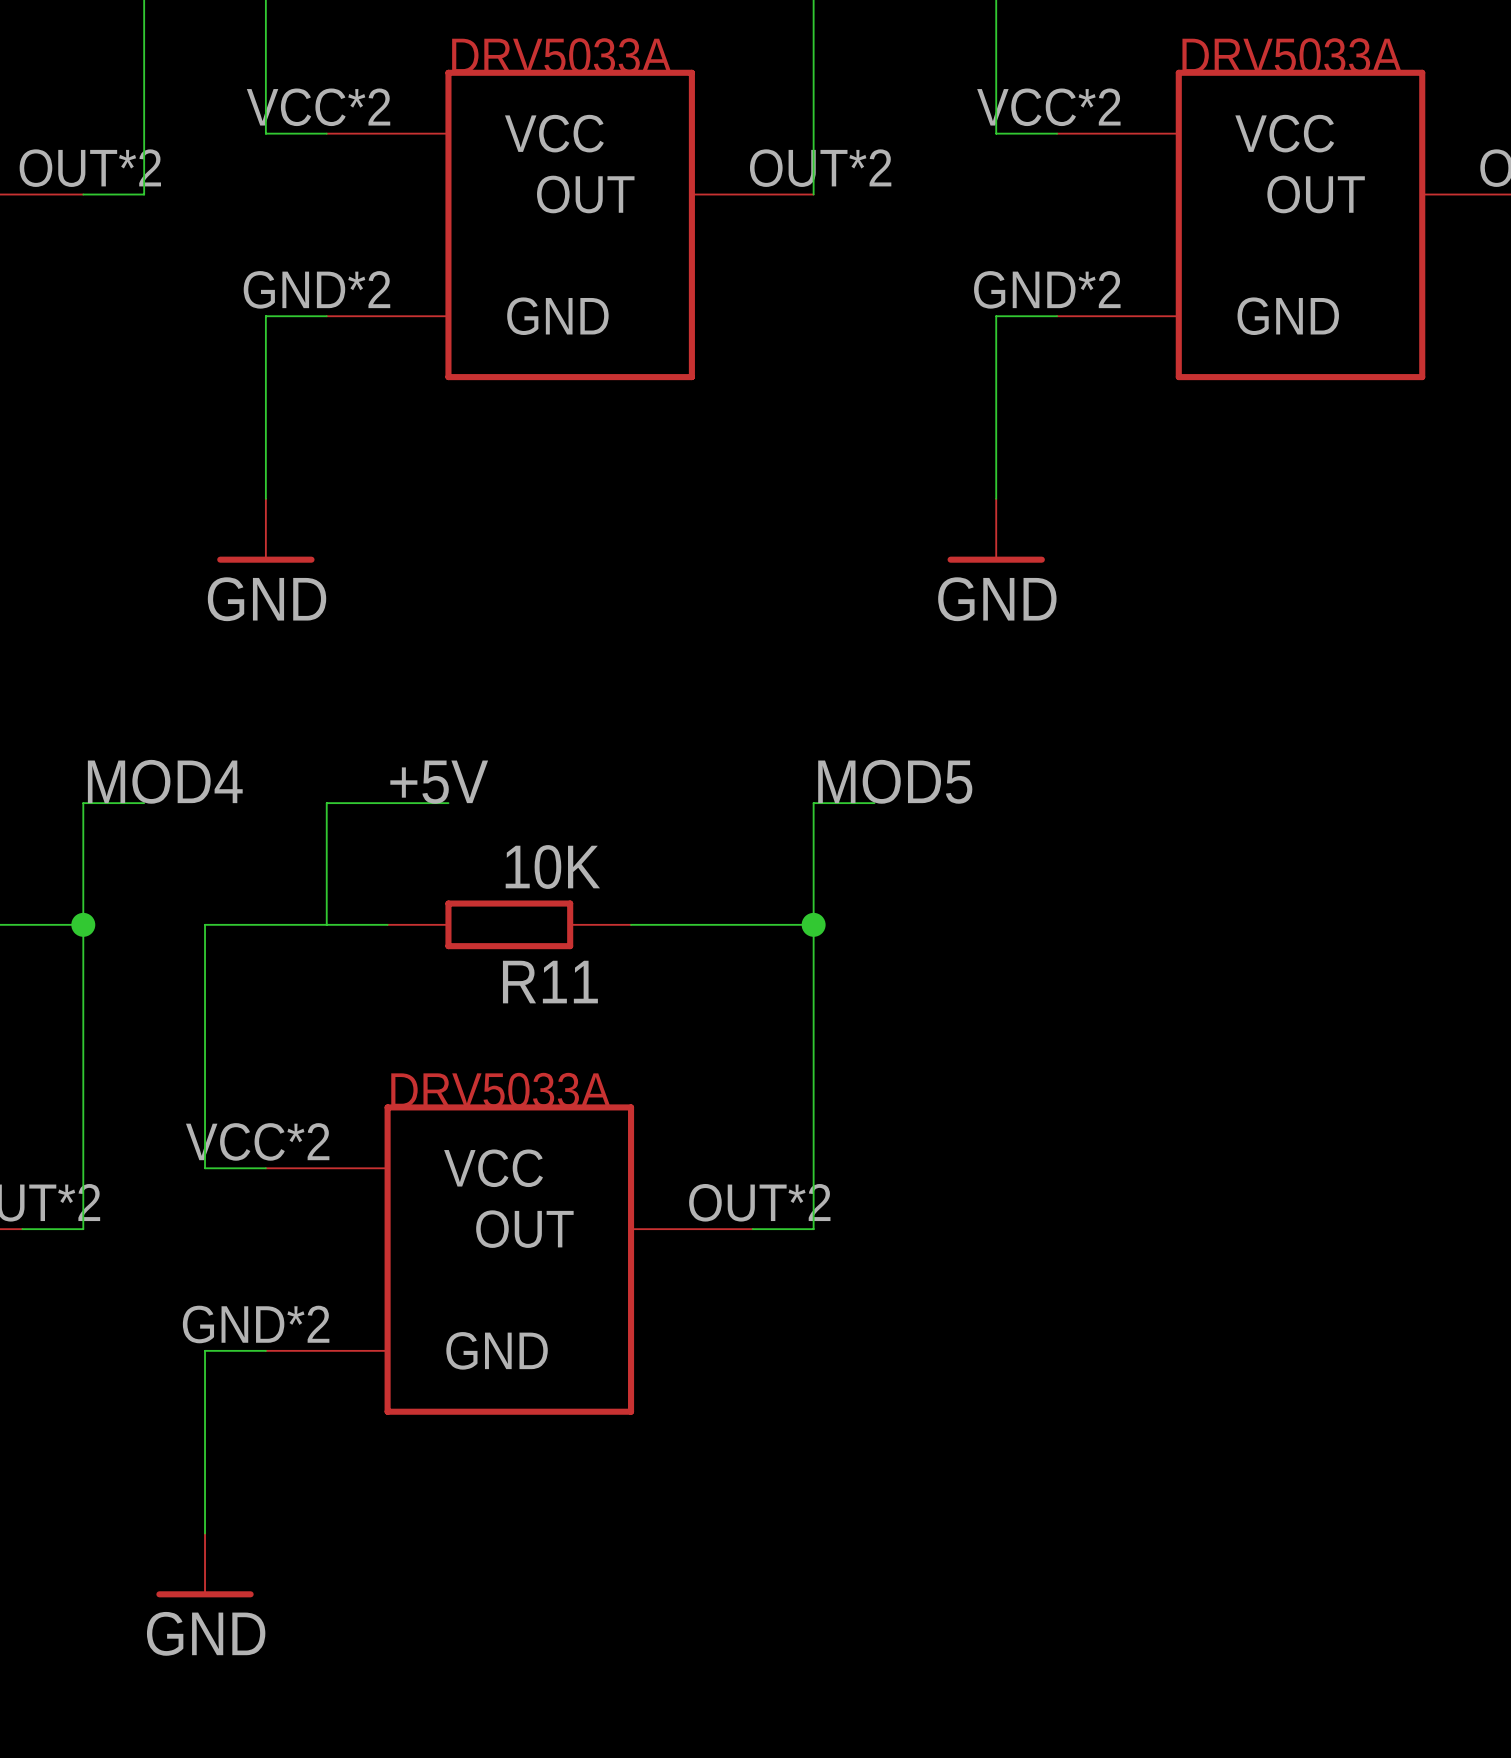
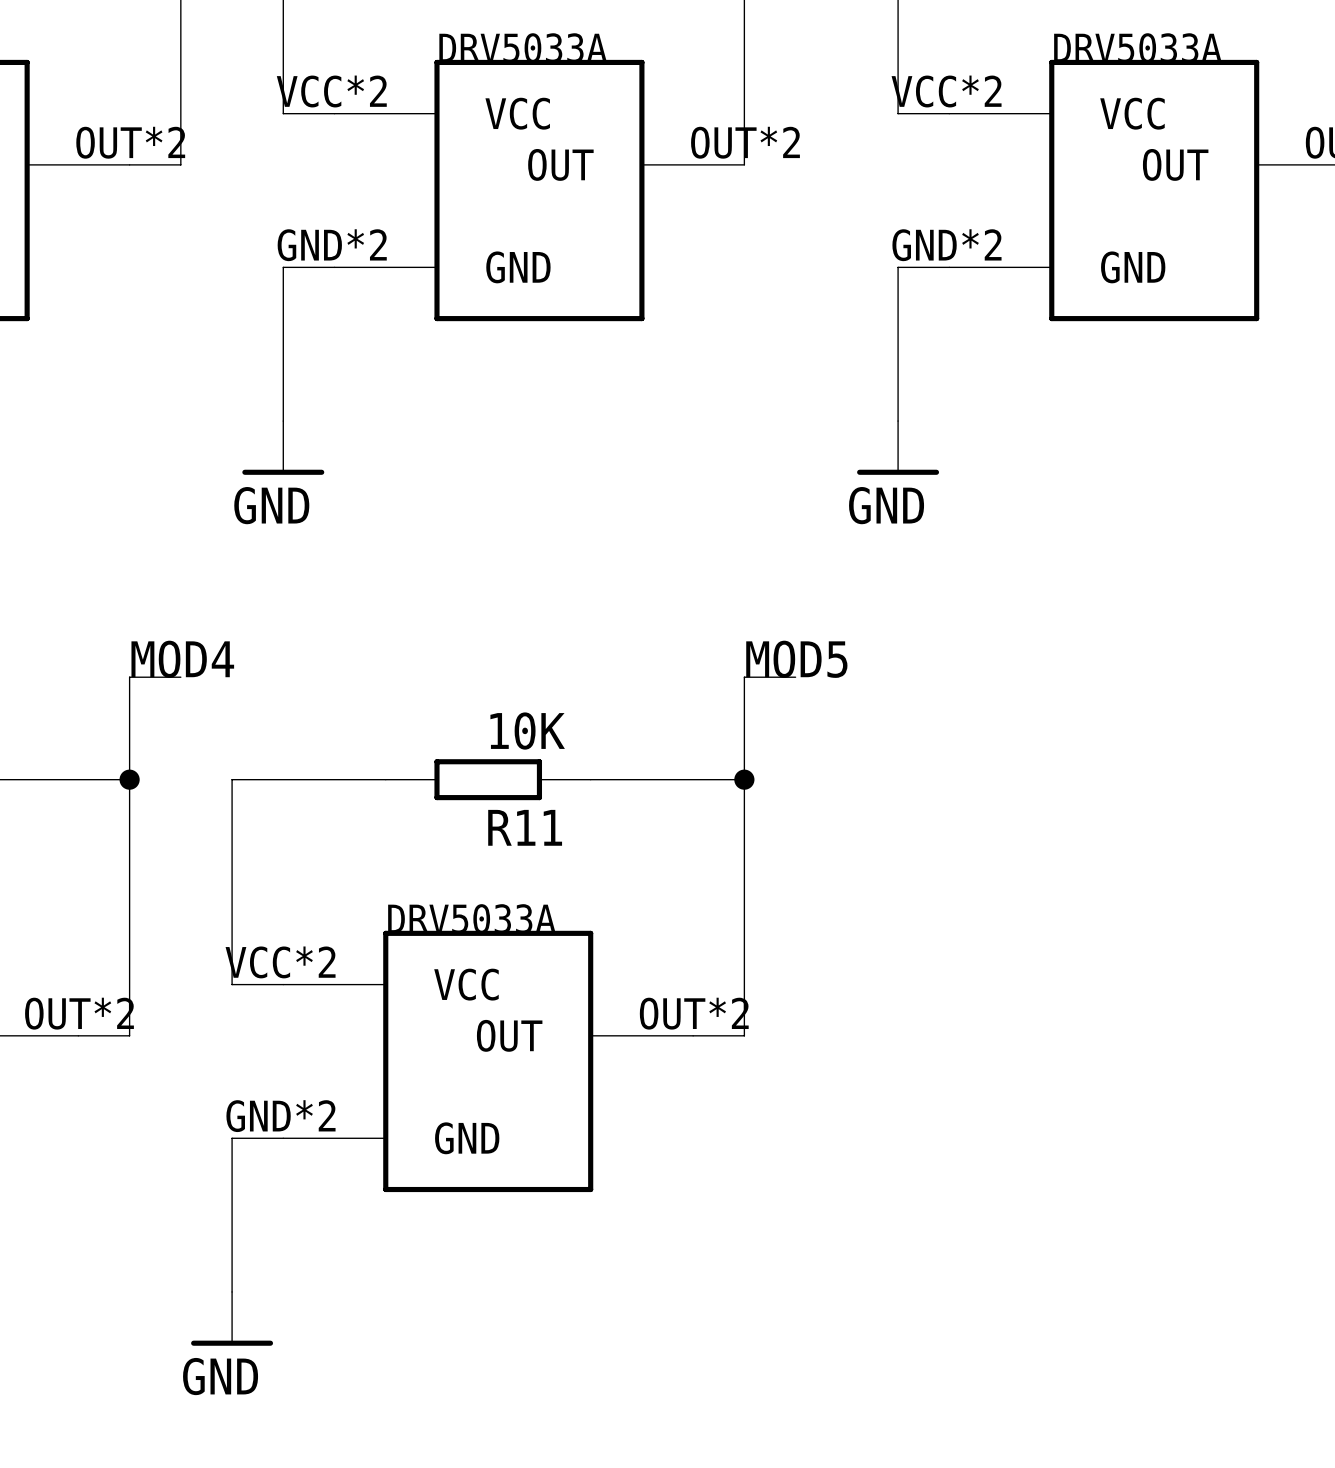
label: +5V (439, 782) -> none
wire: (448, 803) (326, 803) (326, 924) -> none

